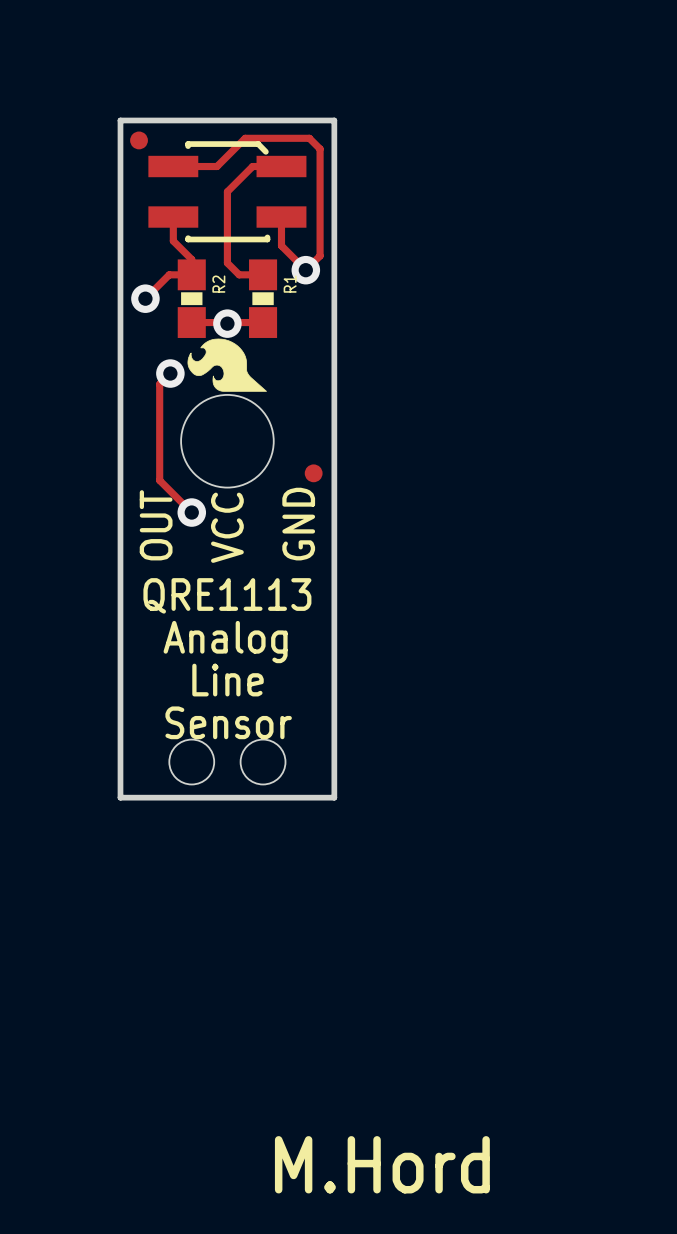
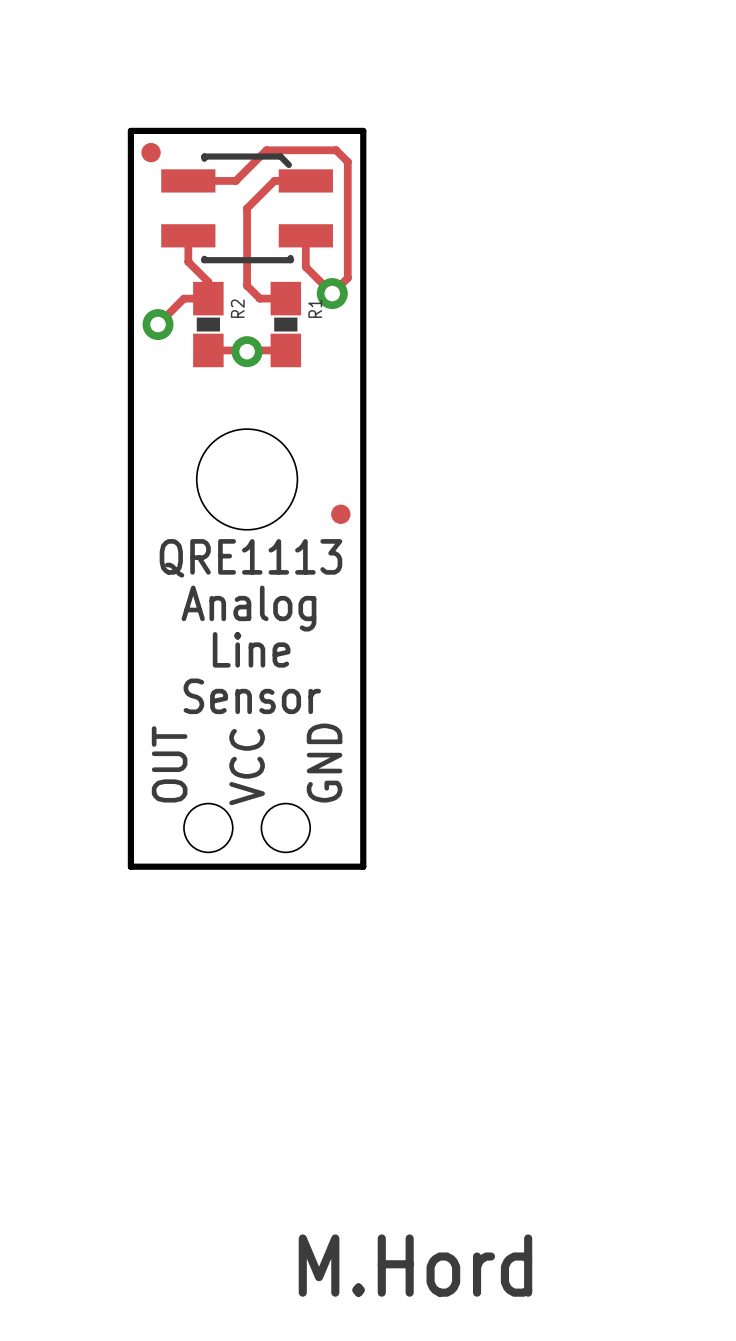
drawing: [187, 338, 267, 392] -> none
track: (170, 373) (159, 384) (159, 480) (191, 512) -> none
via: (170, 373) -> none
via: (191, 512) -> none
text position: GND (298, 524) -> GND (324, 763)
text position: OUT (156, 525) -> OUT (169, 764)
text position: VCC (227, 527) -> VCC (247, 767)
text position: QRE1113 (227, 595) -> QRE1113 (250, 558)
text position: Analog (225, 642) -> Analog (248, 608)
text position: Line (228, 680) -> Line (251, 649)
text position: Sensor (228, 722) -> Sensor (252, 696)

